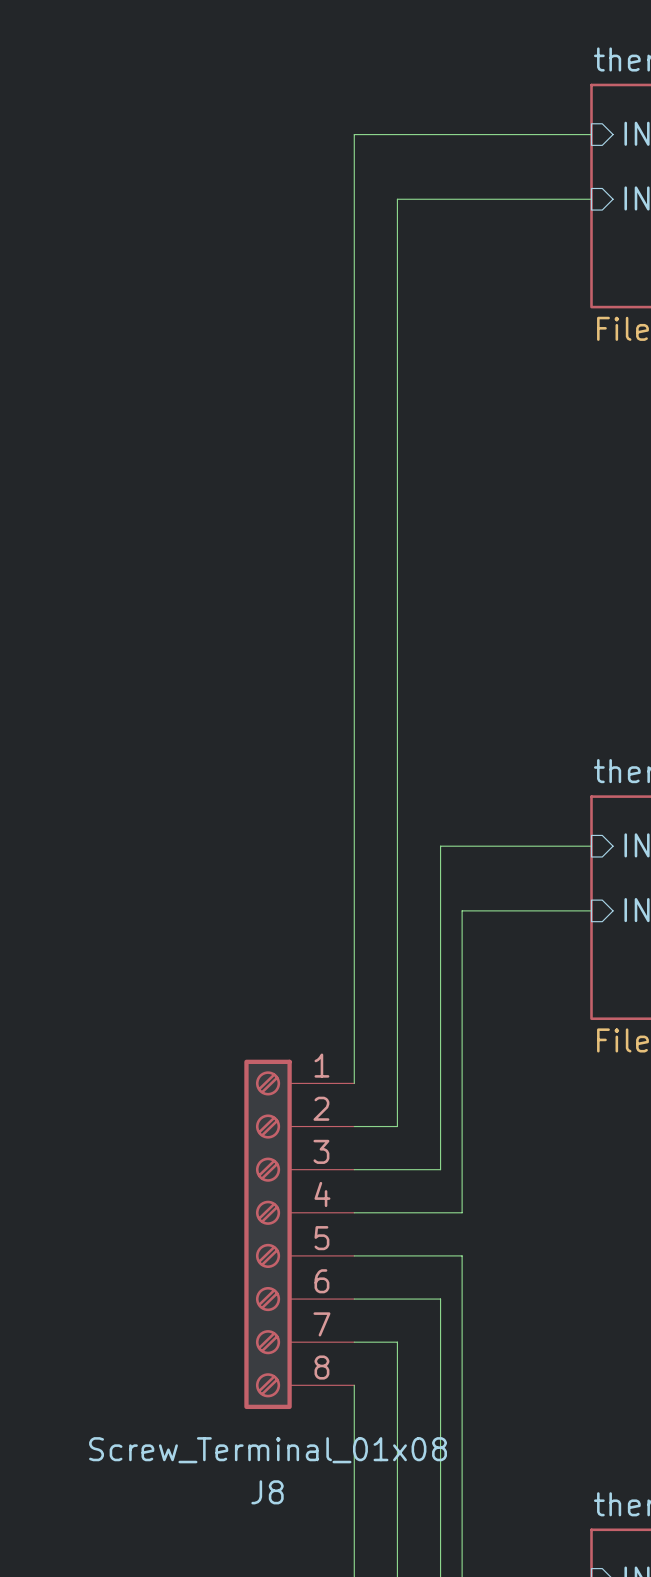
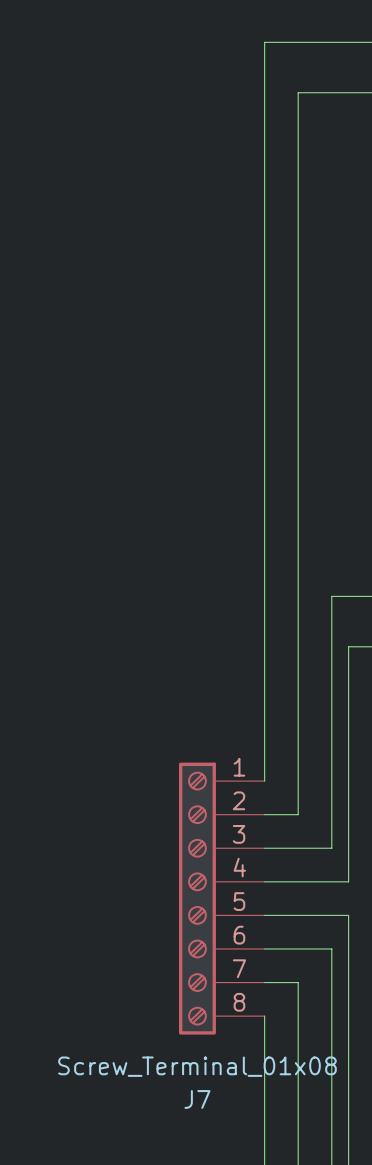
J8 name: J8 (267, 1492) -> J7 (197, 1099)

